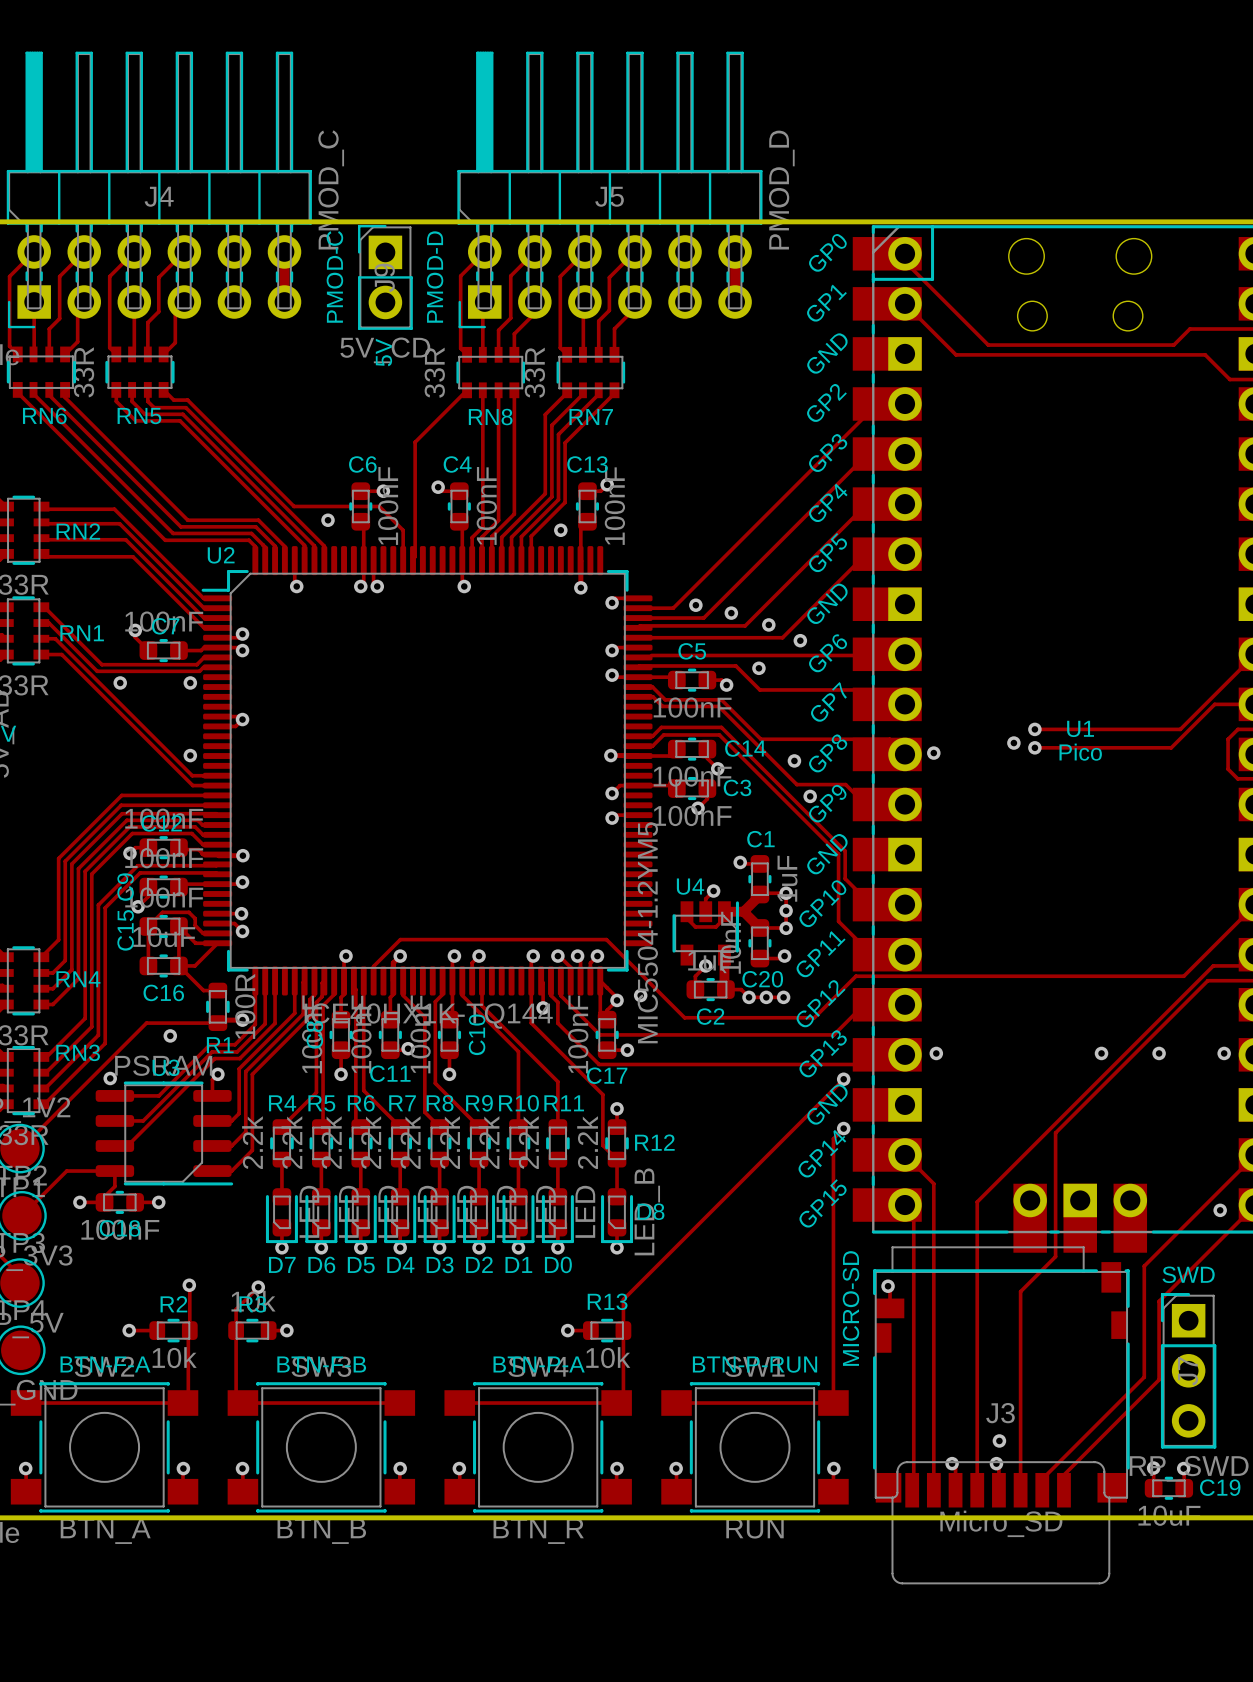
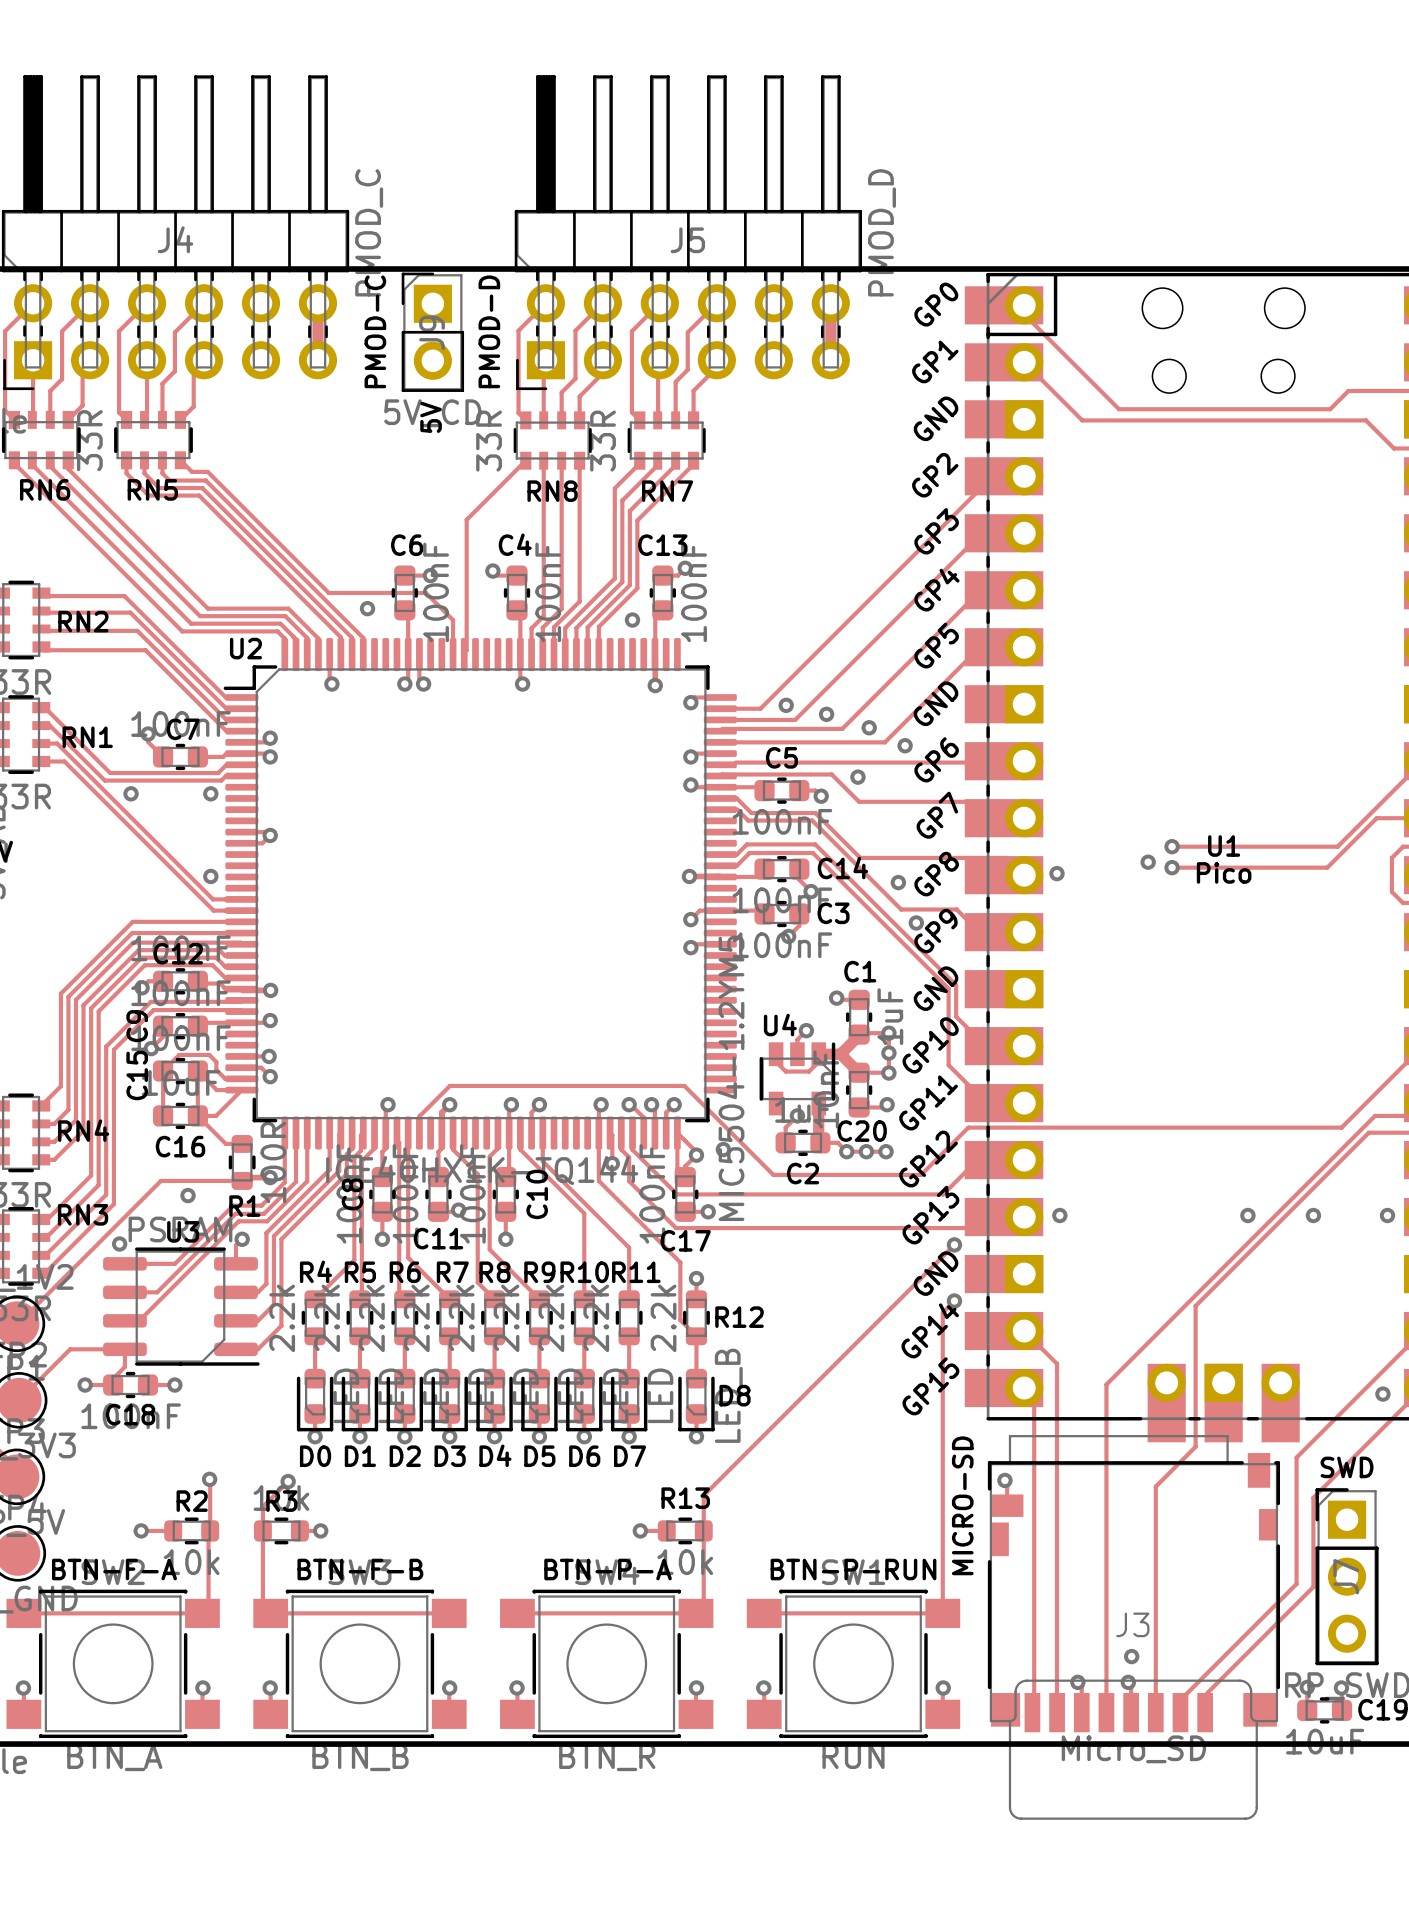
D7 name: D7 (282, 1264) -> D0 (315, 1456)
D6 name: D6 (321, 1264) -> D1 (360, 1456)
D4 name: D4 (400, 1264) -> D3 (450, 1456)
D3 name: D3 (440, 1264) -> D4 (495, 1455)
D2 name: D2 (479, 1264) -> D5 (539, 1456)
D1 name: D1 (518, 1264) -> D6 (584, 1456)
D0 name: D0 (558, 1264) -> D7 (630, 1456)
D5 name: D5 (361, 1265) -> D2 (405, 1456)

